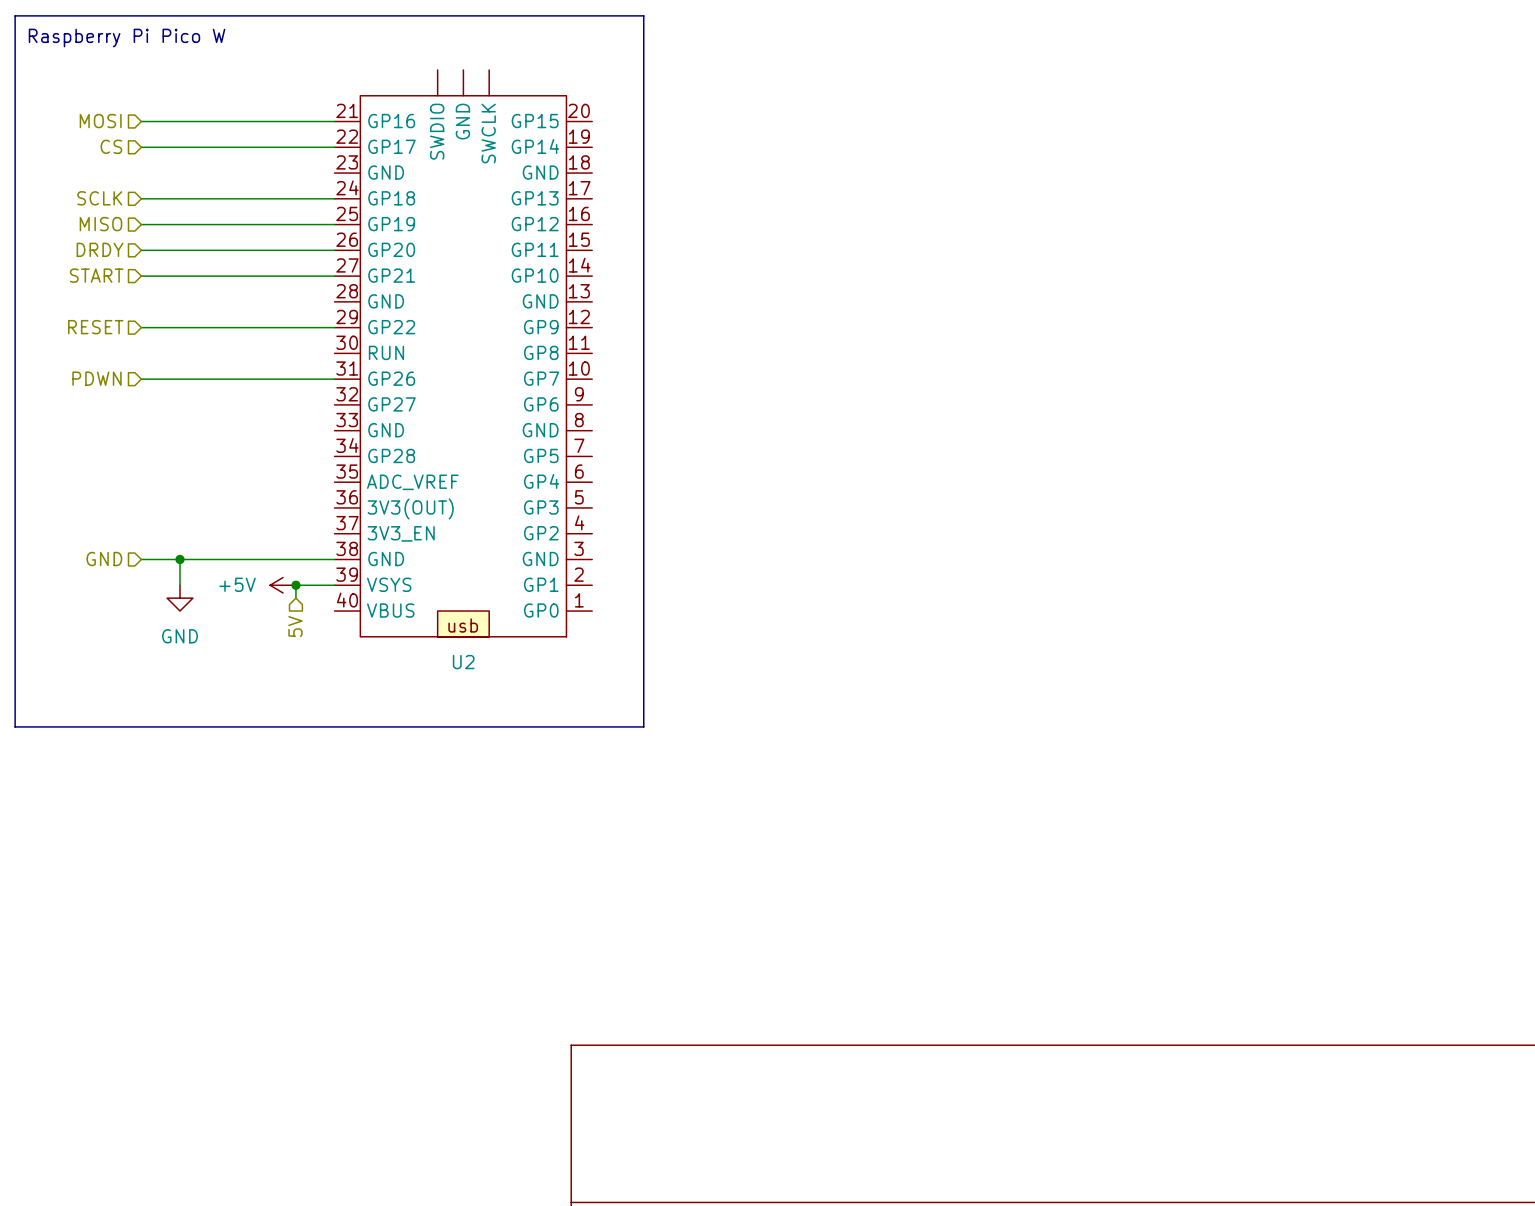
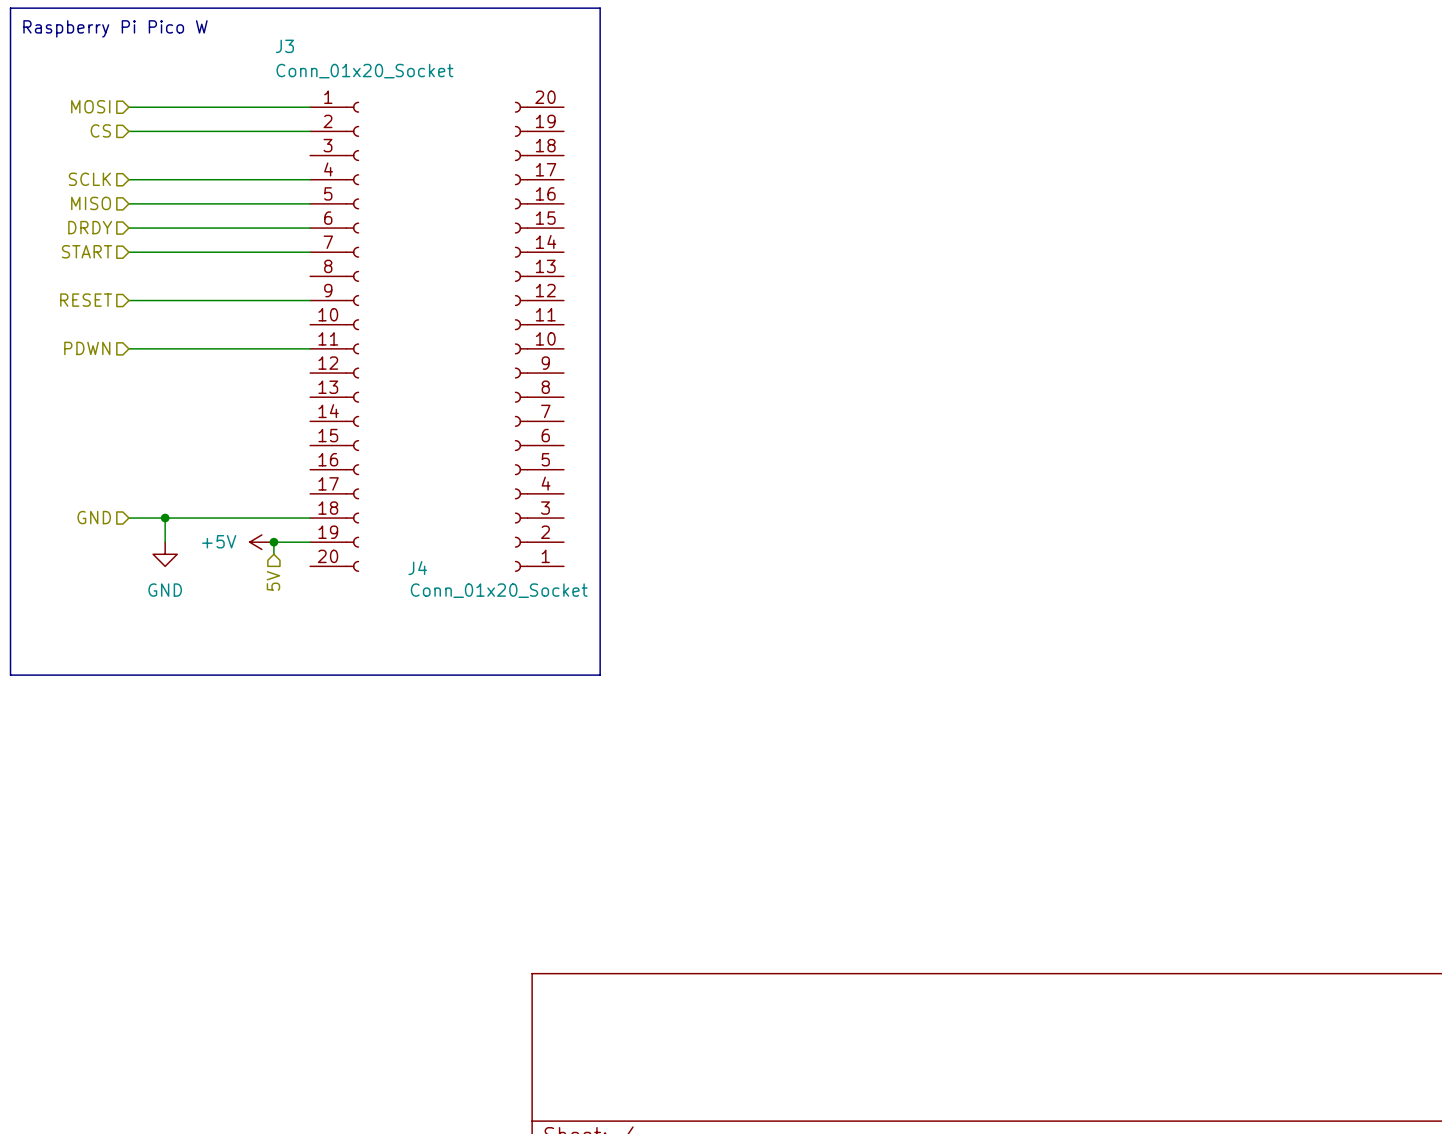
U2: (463, 353) -> none
J3: none -> Conn_01x20_Socket (334, 336)
J4: none -> Conn_01x20_Socket (539, 336)

